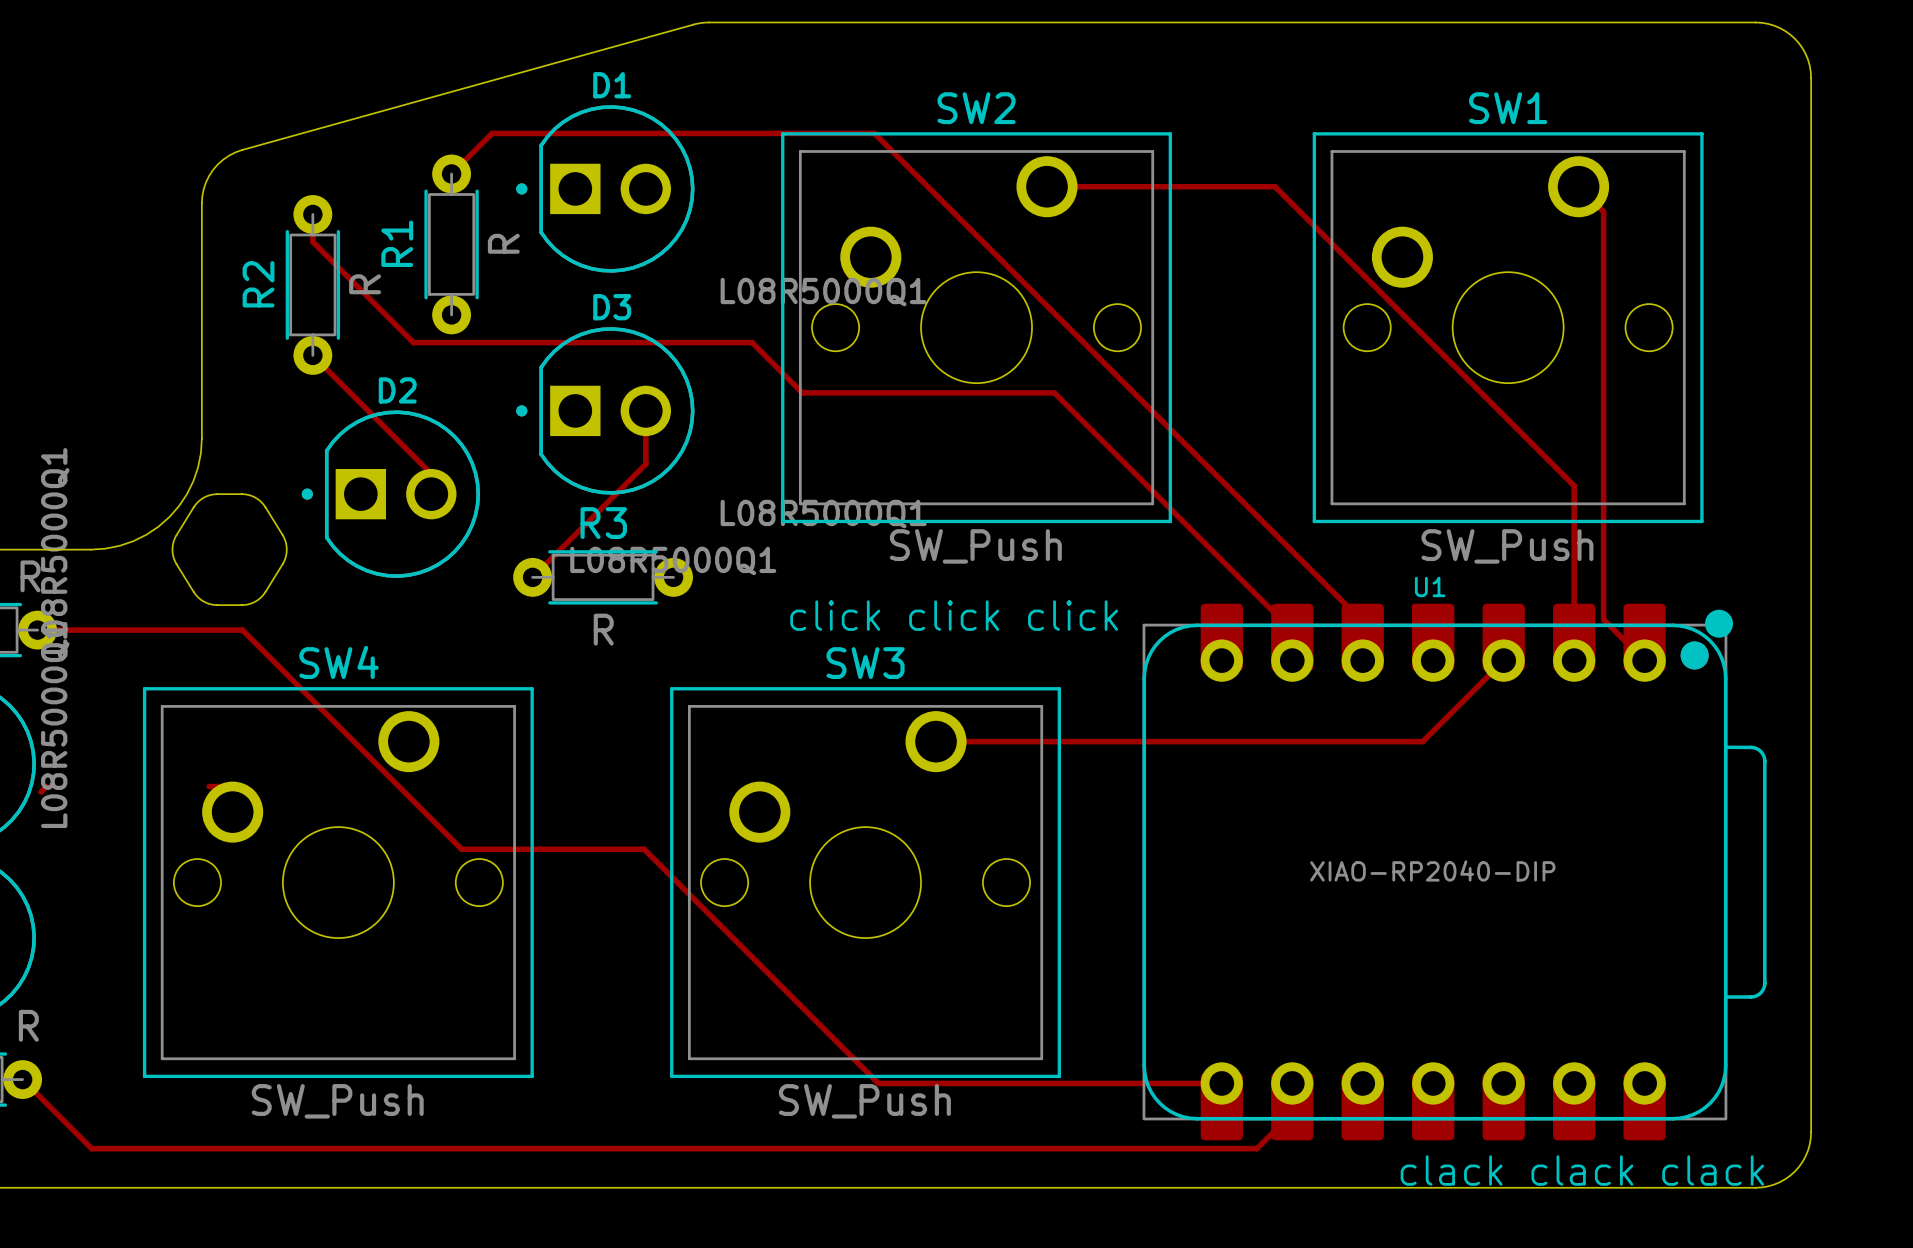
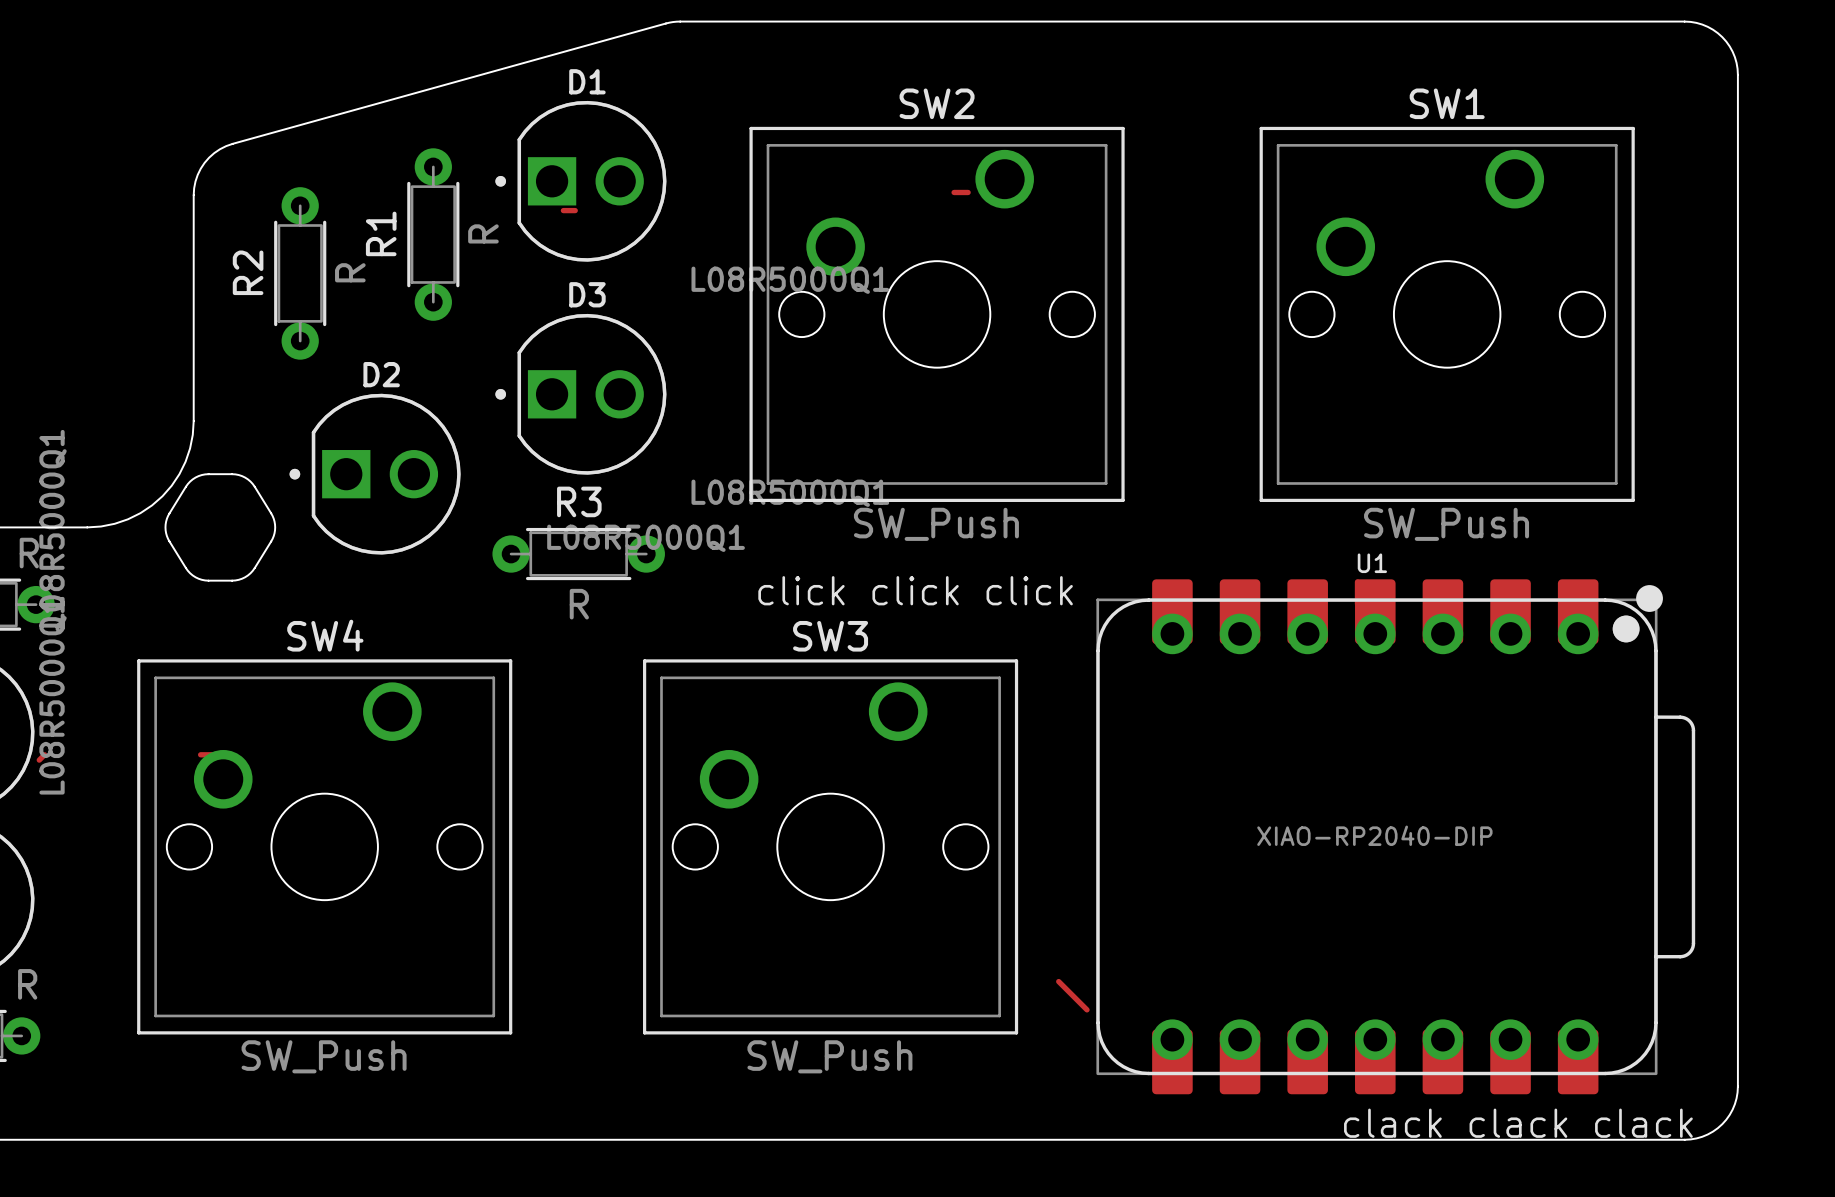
track: (451, 173) (492, 133) (874, 133) (1362, 621) (1362, 660) -> none
track: (1047, 186) (1274, 186) (1574, 485) (1574, 660) -> none
track: (1578, 186) (1603, 211) (1603, 619) (1644, 660) -> none
track: none -> (954, 192) (968, 192)
track: (312, 214) (312, 241) (413, 342) (752, 342) (802, 392) (1054, 392) (1292, 630) (1292, 660) -> none
track: none -> (563, 210) (575, 210)
track: (312, 355) (431, 473) (431, 494) -> none
track: (645, 410) (645, 464) (532, 577) -> none
track: (37, 630) (242, 630) (461, 849) (644, 849) (878, 1083) (1221, 1083) -> none
track: (1503, 660) (1422, 741) (936, 741) -> none
track: none -> (1058, 981) (1086, 1009)
track: (22, 1079) (91, 1148) (1256, 1148) (1292, 1113) (1292, 1083) -> none

